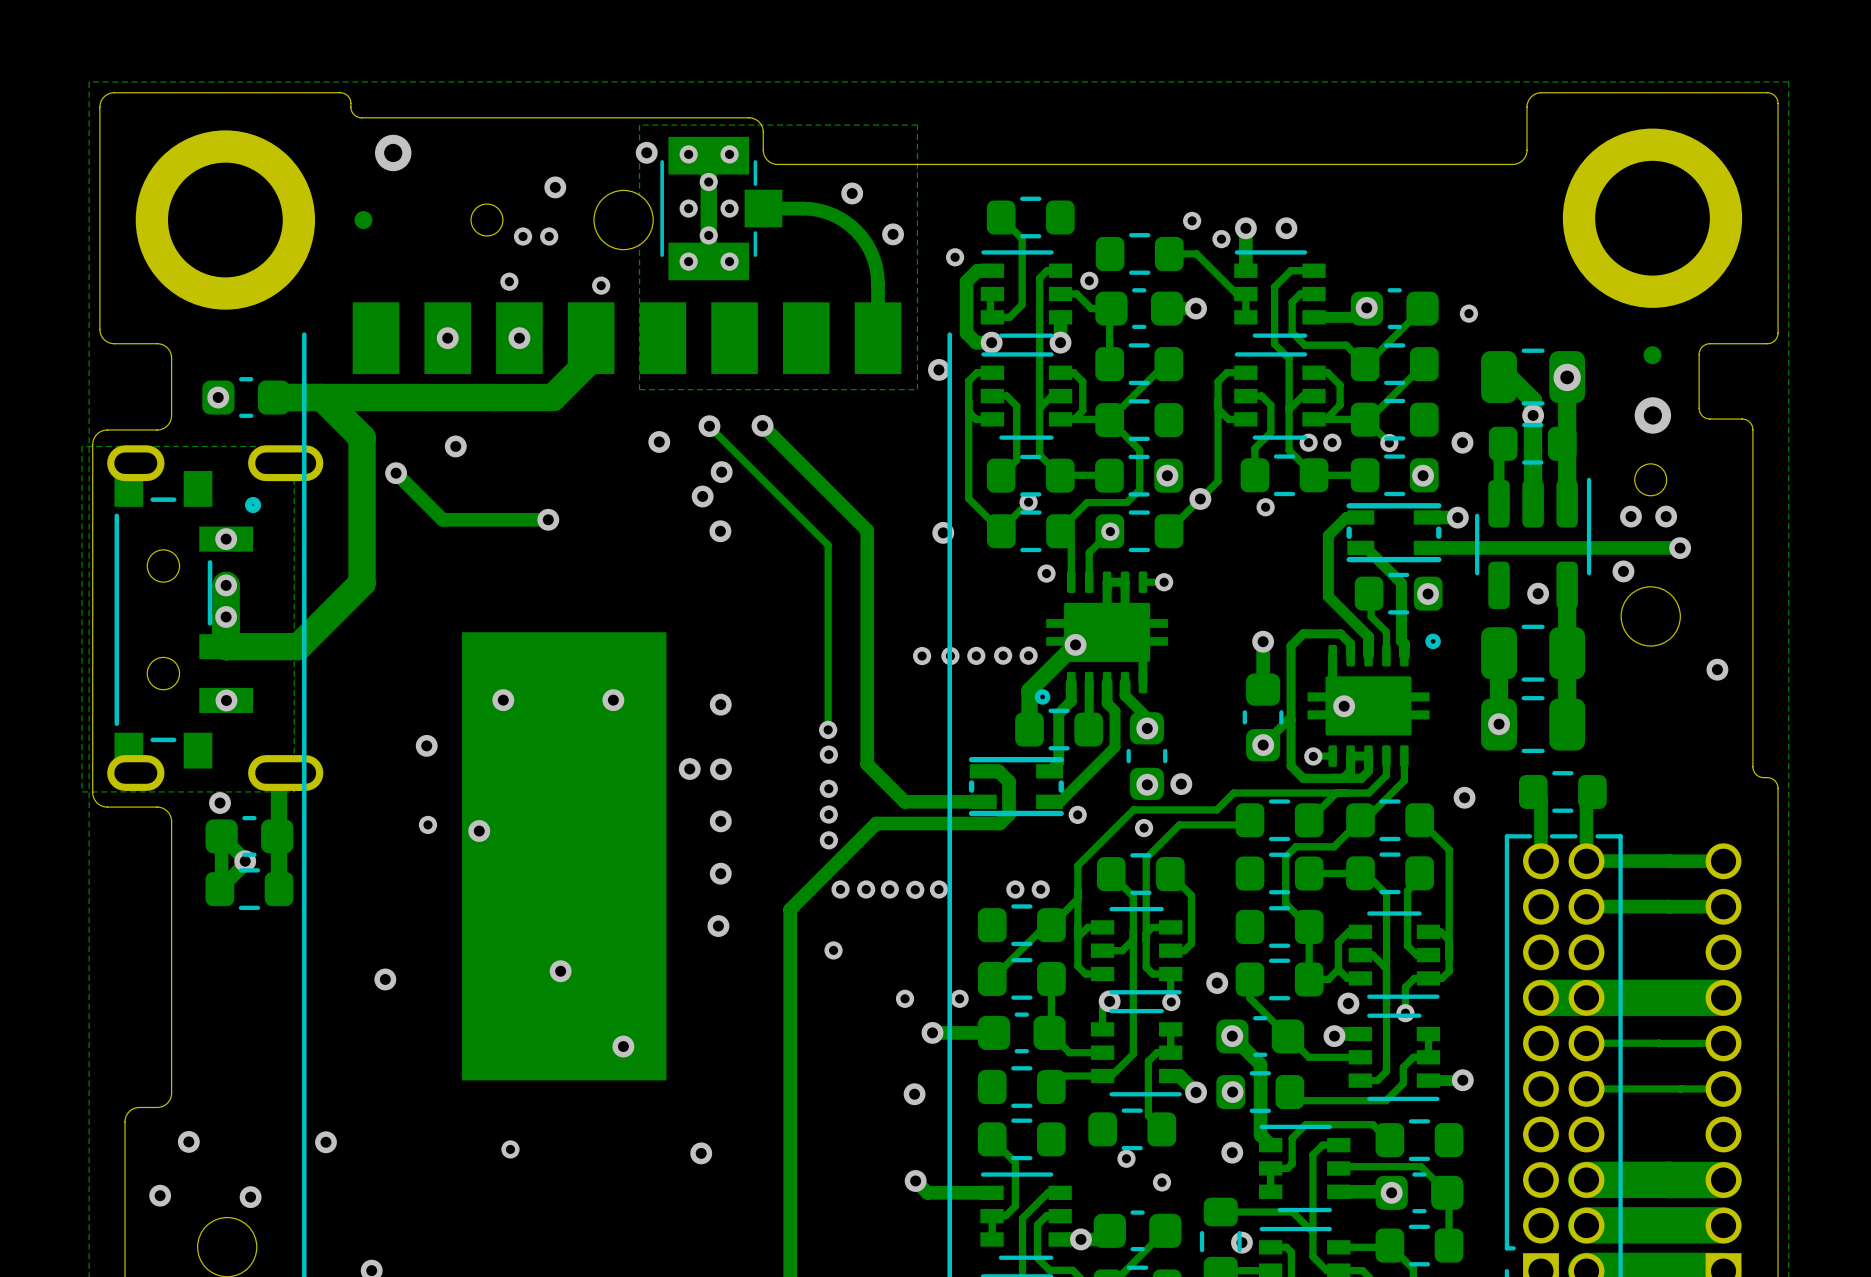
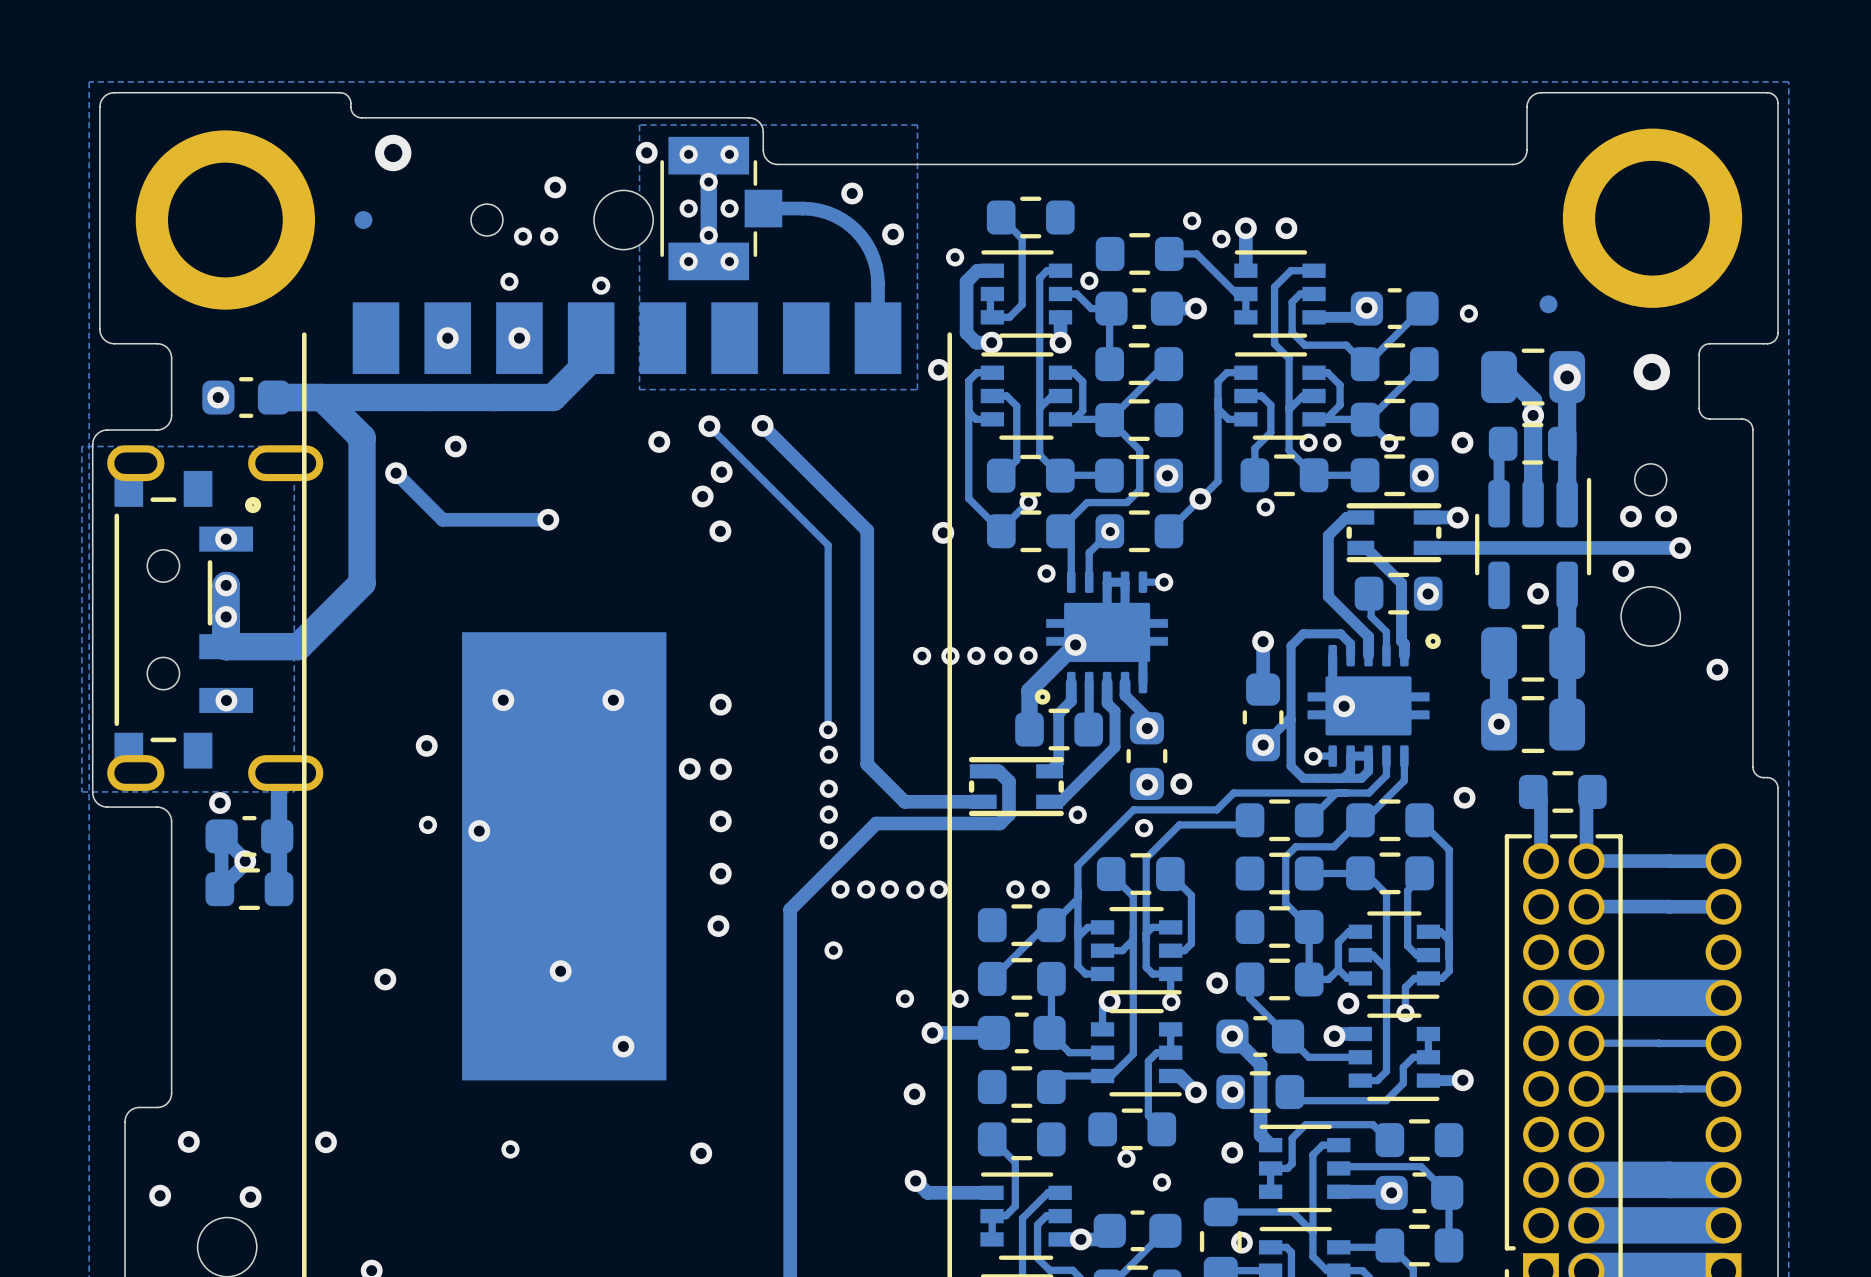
part position: (1652, 355) -> (1548, 304)
via position: (1652, 415) -> (1651, 372)

